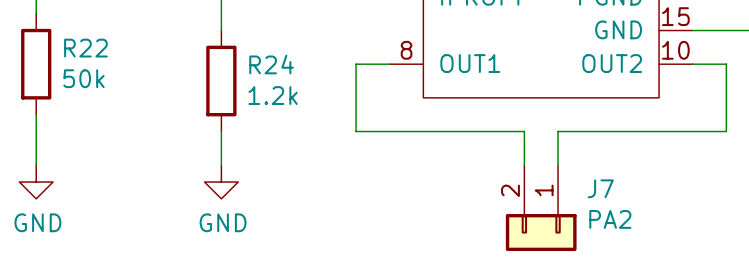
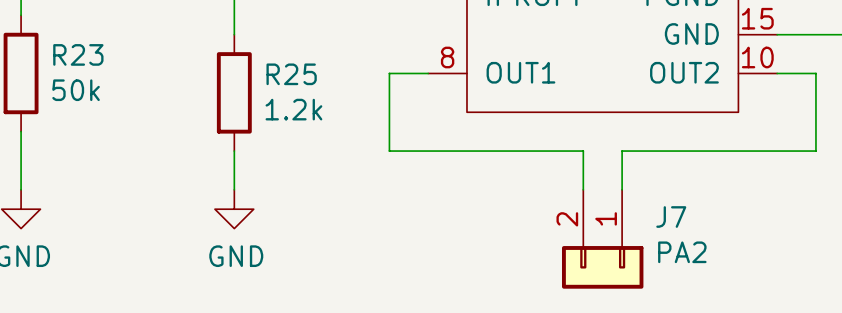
R22 name: R22 (85, 48) -> R23 (78, 54)
R24 name: R24 (271, 64) -> R25 (291, 74)

